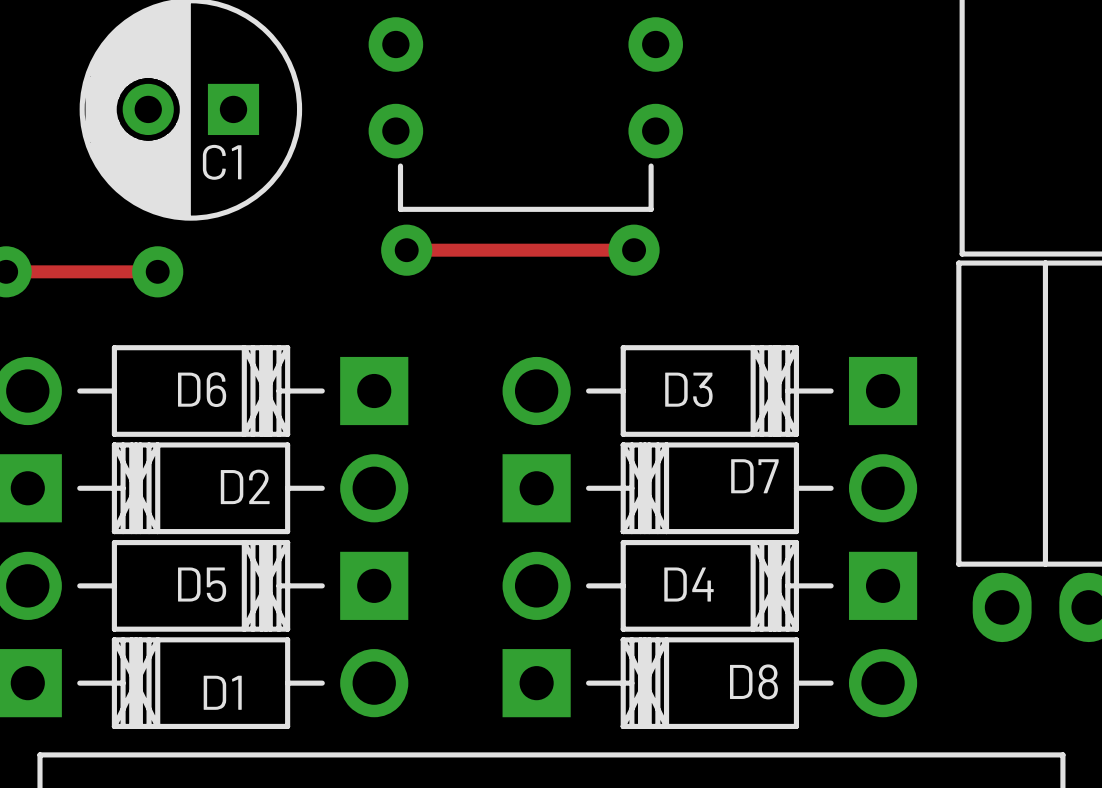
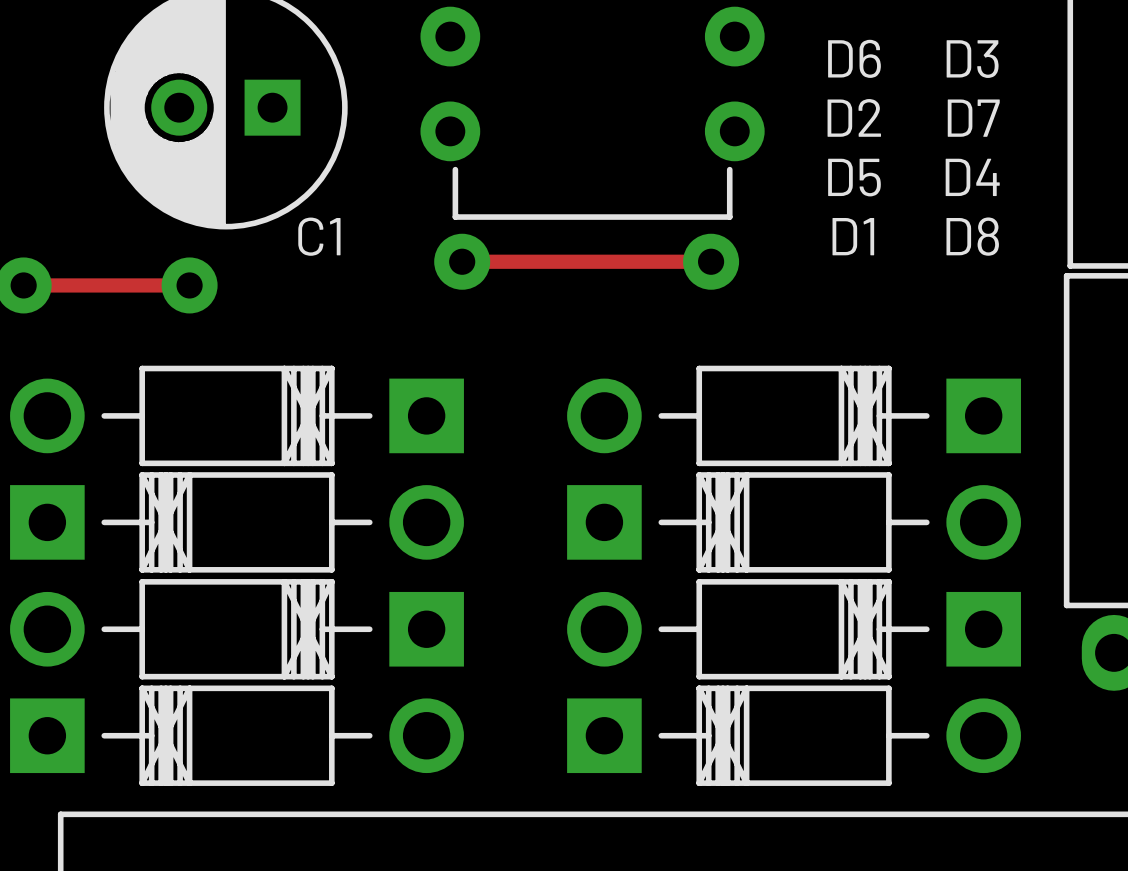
C1 name position: C1 (222, 162) -> C1 (319, 236)
D6 name position: D6 (202, 389) -> D6 (854, 58)
D3 name position: D3 (688, 389) -> D3 (972, 59)
D7 name position: D7 (754, 476) -> D7 (973, 118)
D2 name position: D2 (245, 486) -> D2 (854, 117)
D5 name position: D5 (202, 584) -> D5 (854, 177)
D4 name position: D4 (689, 584) -> D4 (972, 177)
D8 name position: D8 (753, 681) -> D8 (972, 236)
D1 name position: D1 (222, 692) -> D1 (853, 236)

